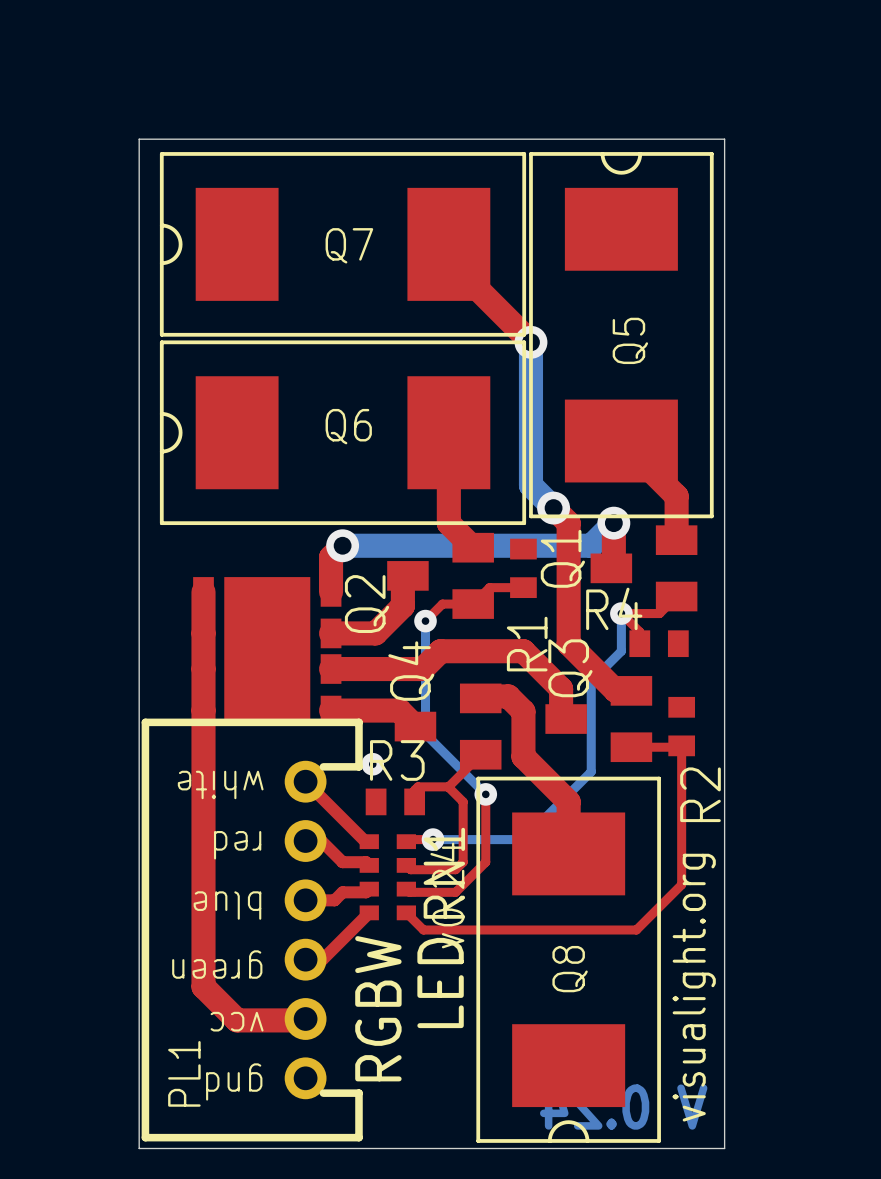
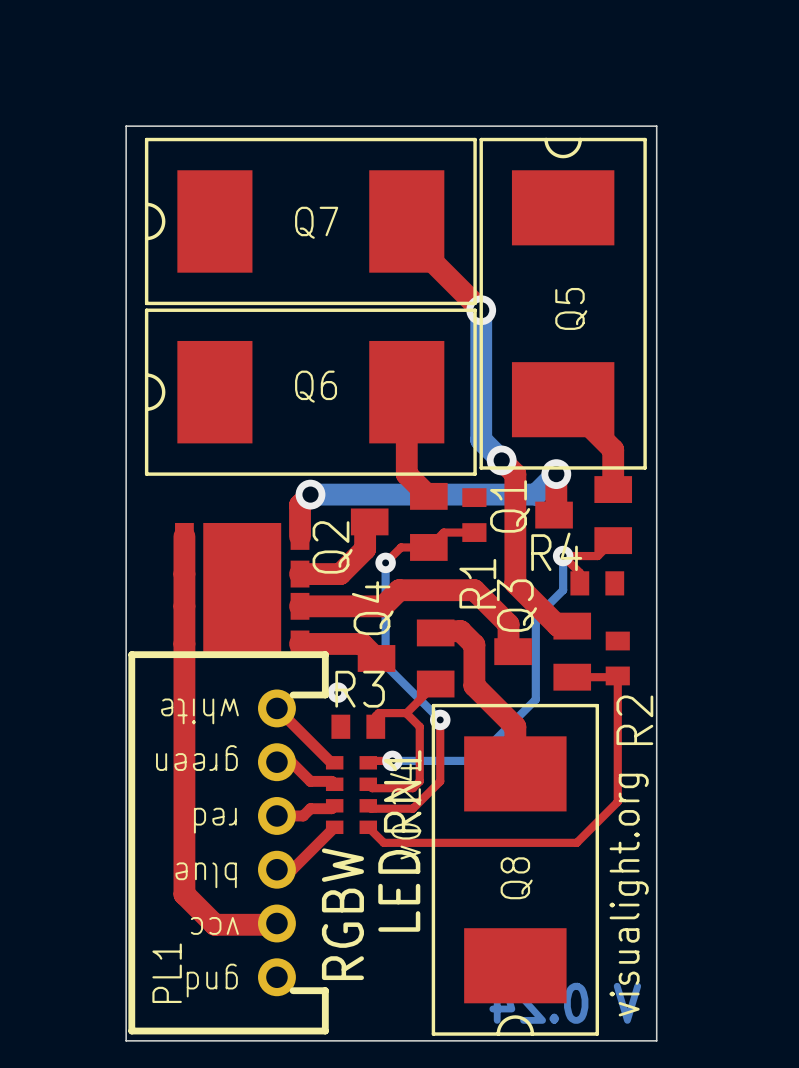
text: red (237, 845) -> green (196, 758)
text: blue (227, 905) -> red (215, 820)
text: green (217, 964) -> blue (206, 875)

